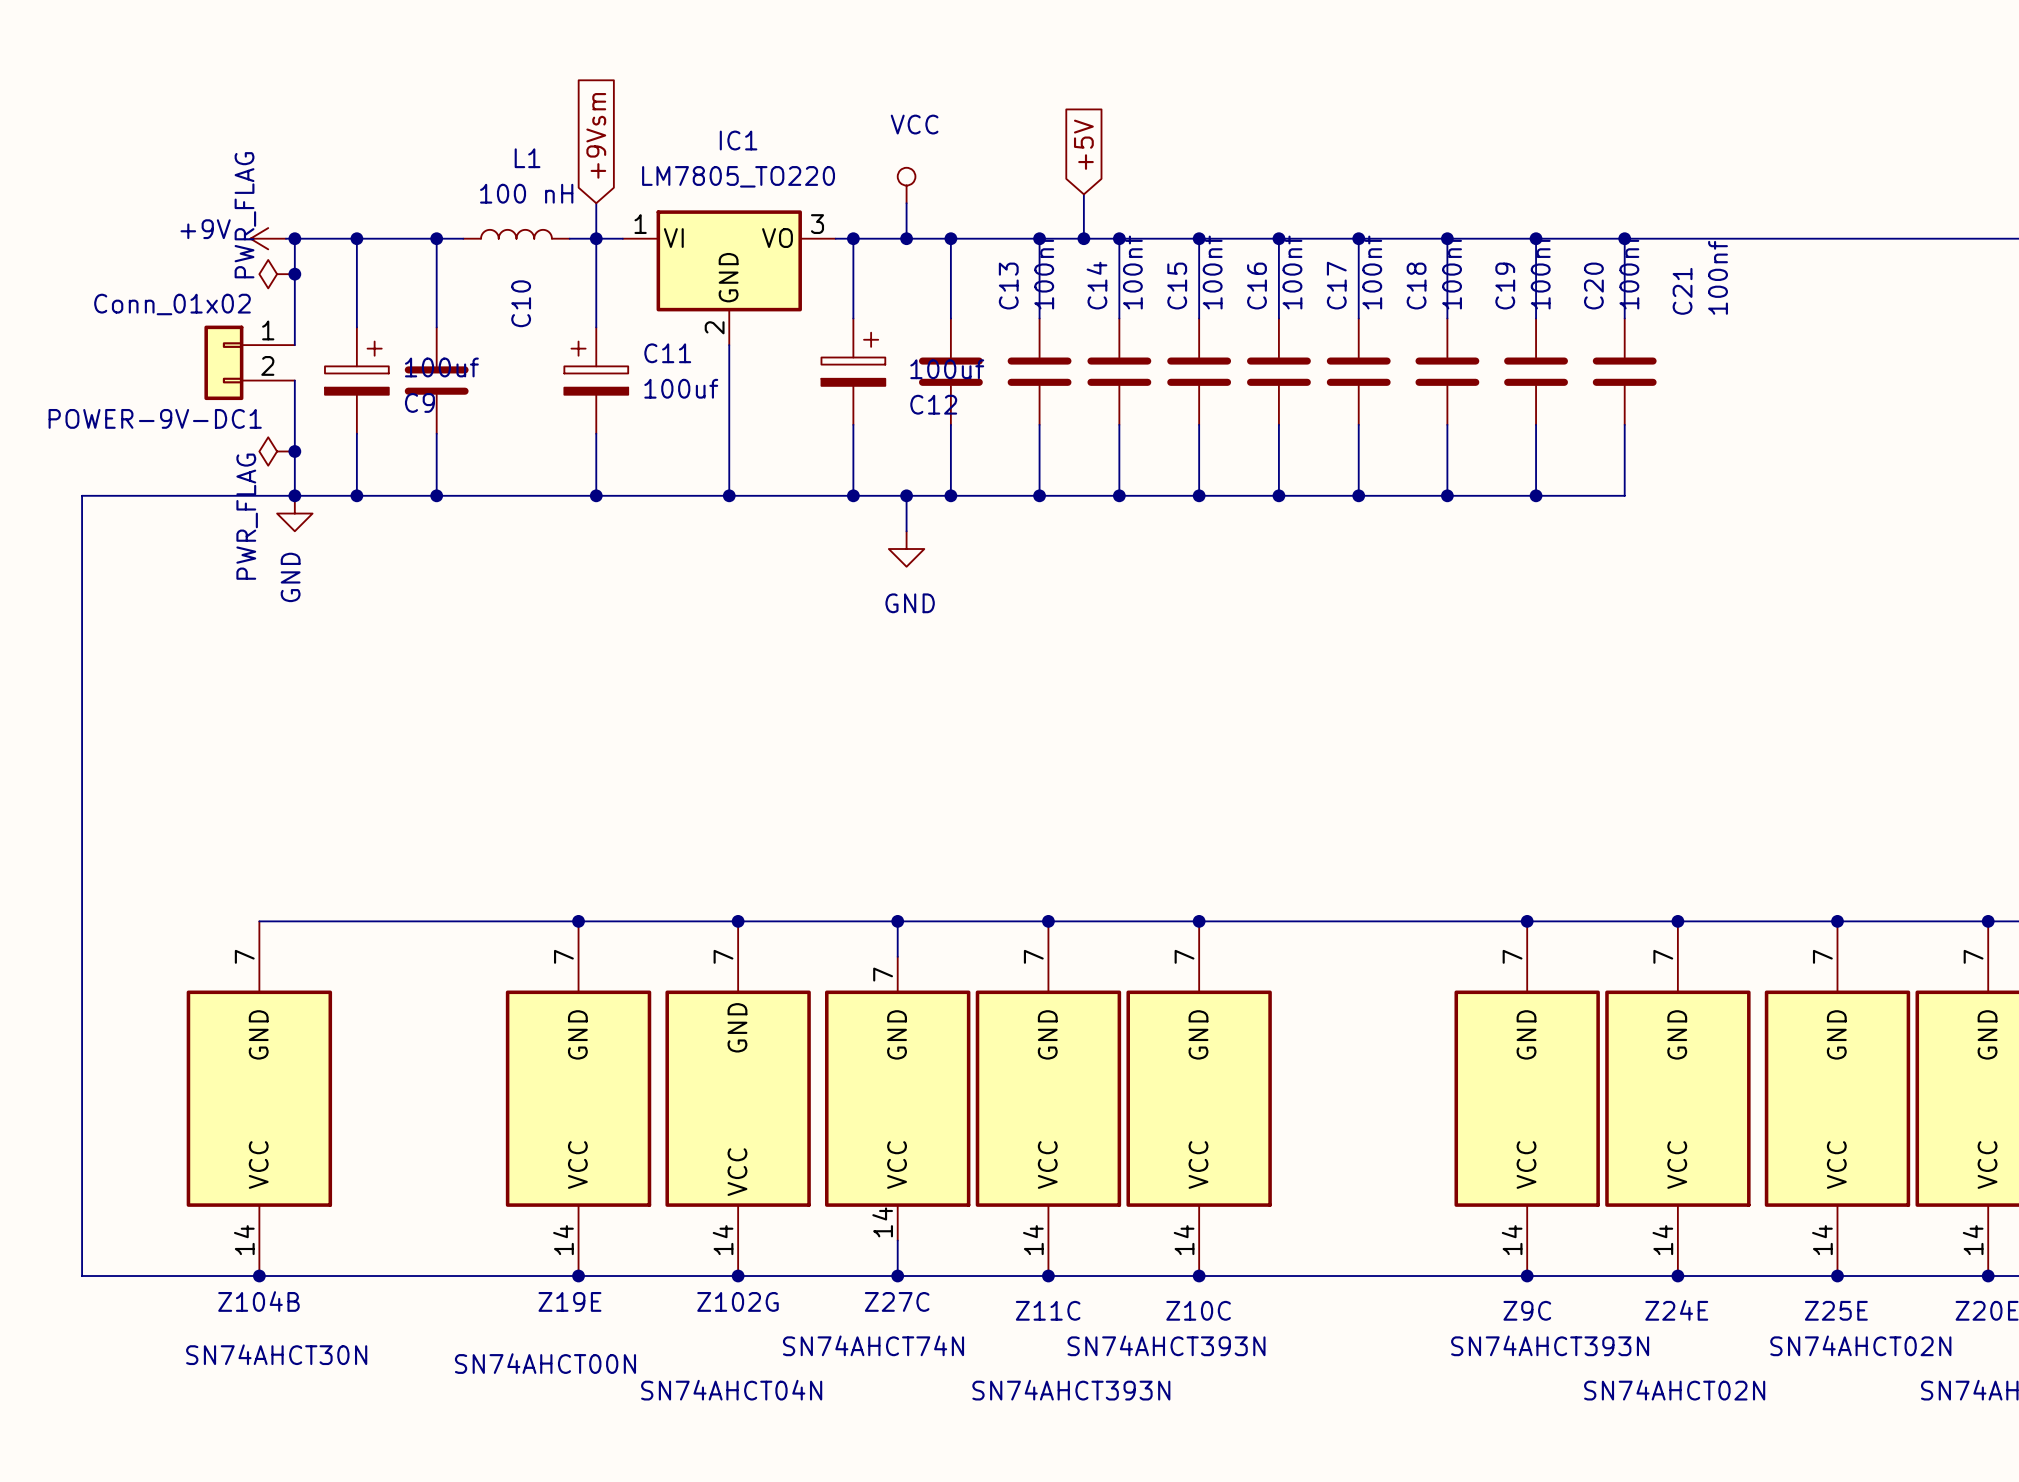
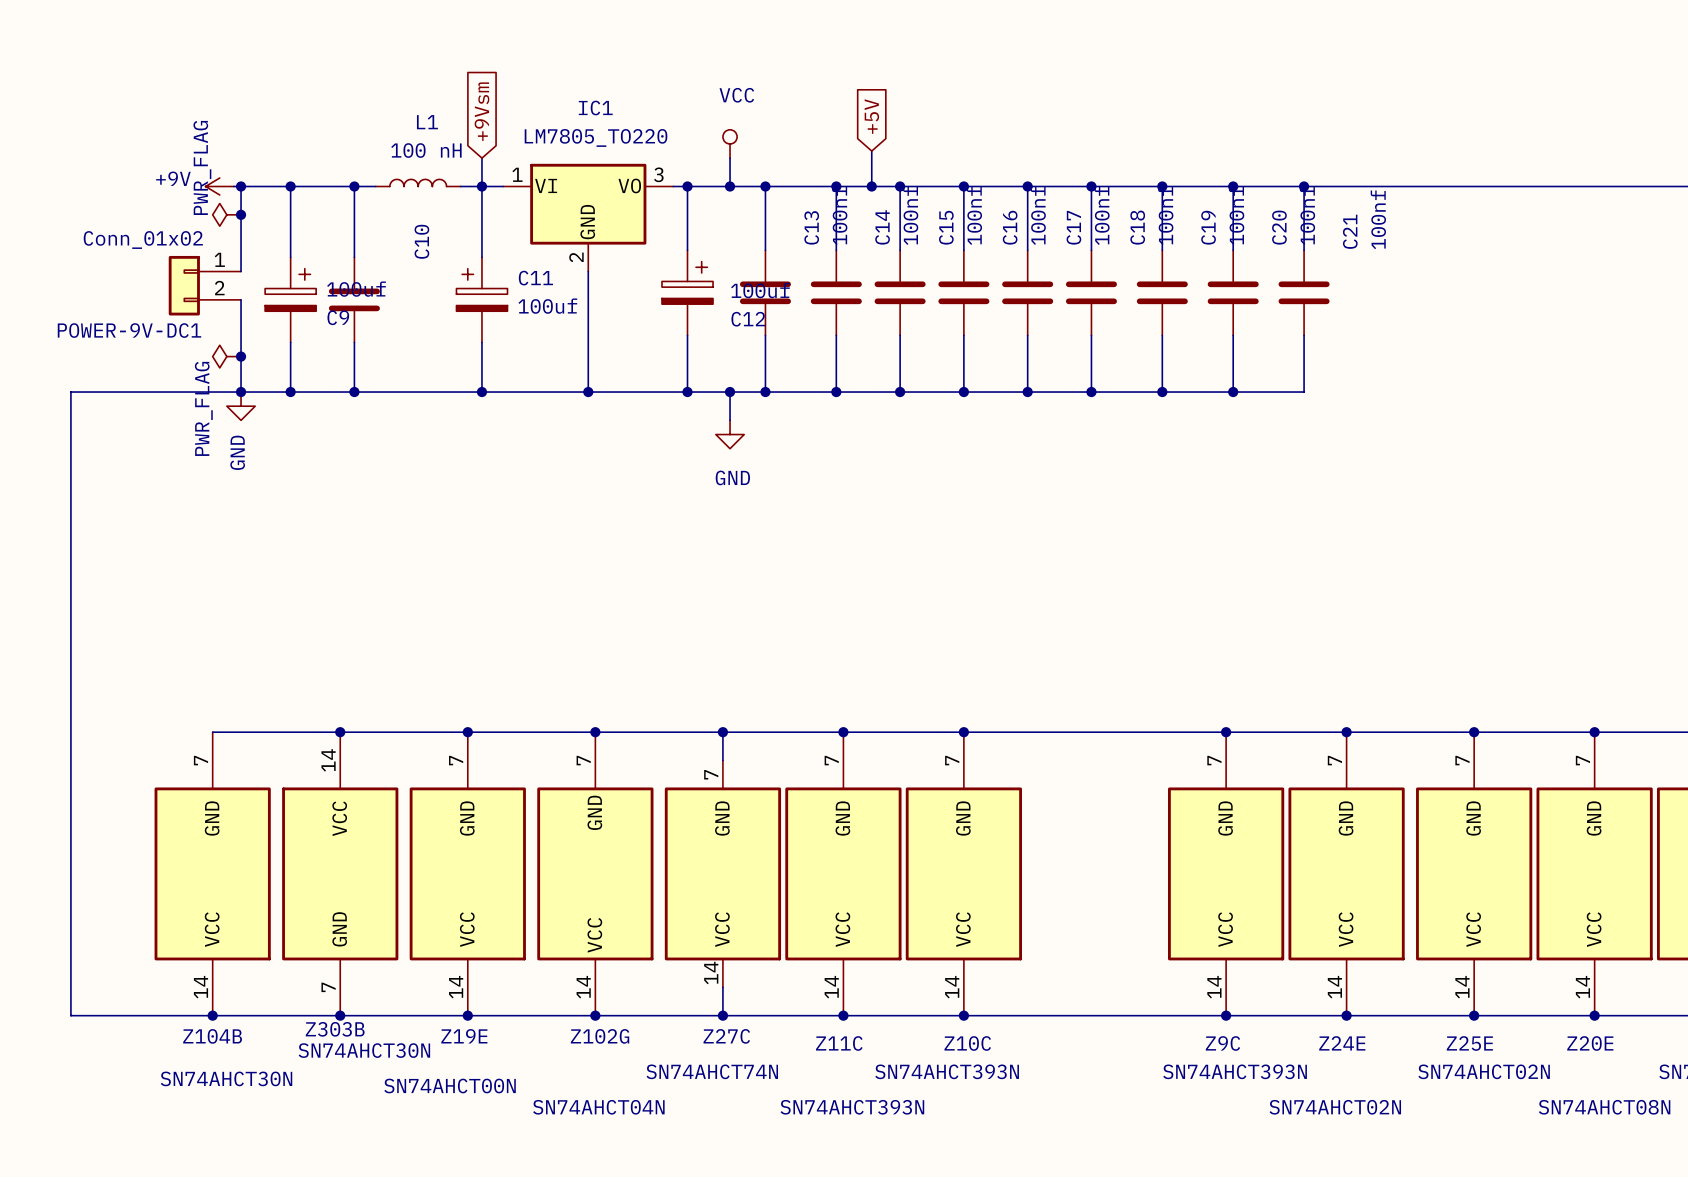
junction: none -> (340, 732)
Z303B: none -> SN74AHCT30N (340, 873)
junction: none -> (340, 1015)

